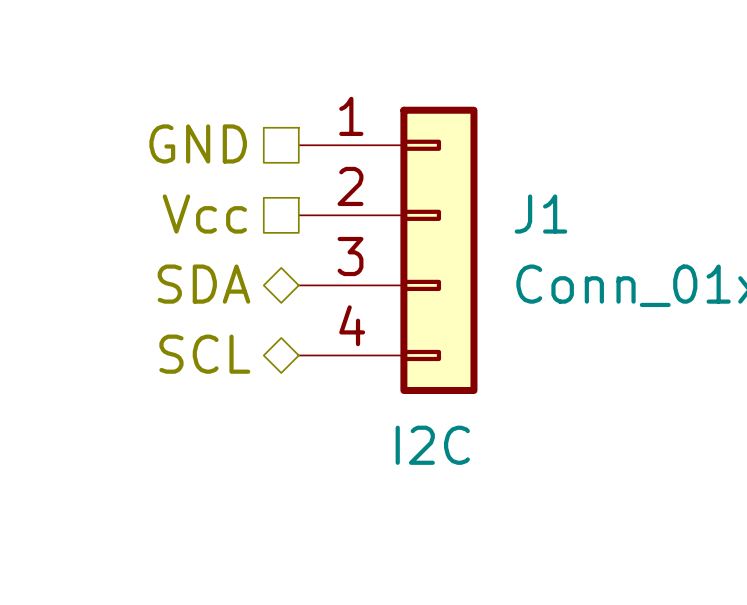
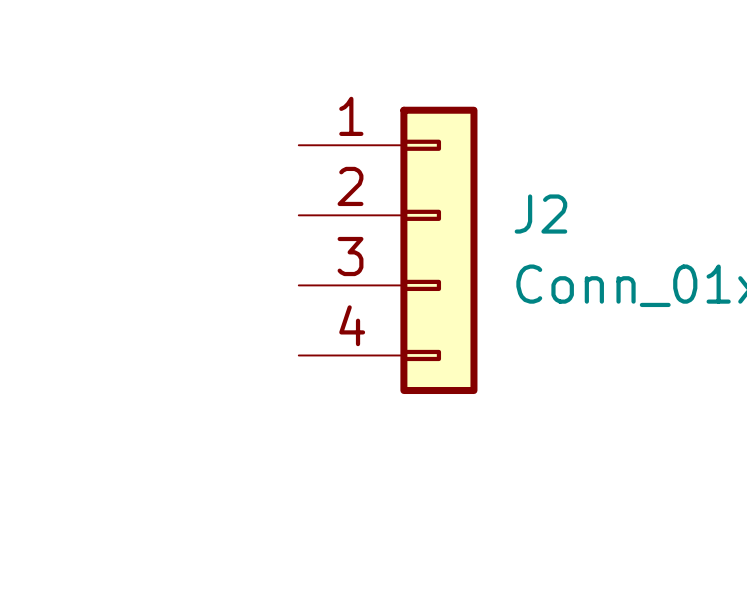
hierarchical label: GND (198, 143) -> none
hierarchical label: Vcc (204, 214) -> none
J1 name: J1 (540, 214) -> J2 (540, 214)
hierarchical label: SDA (203, 284) -> none
hierarchical label: SCL (204, 354) -> none
J1 text: I2C (432, 445) -> none

